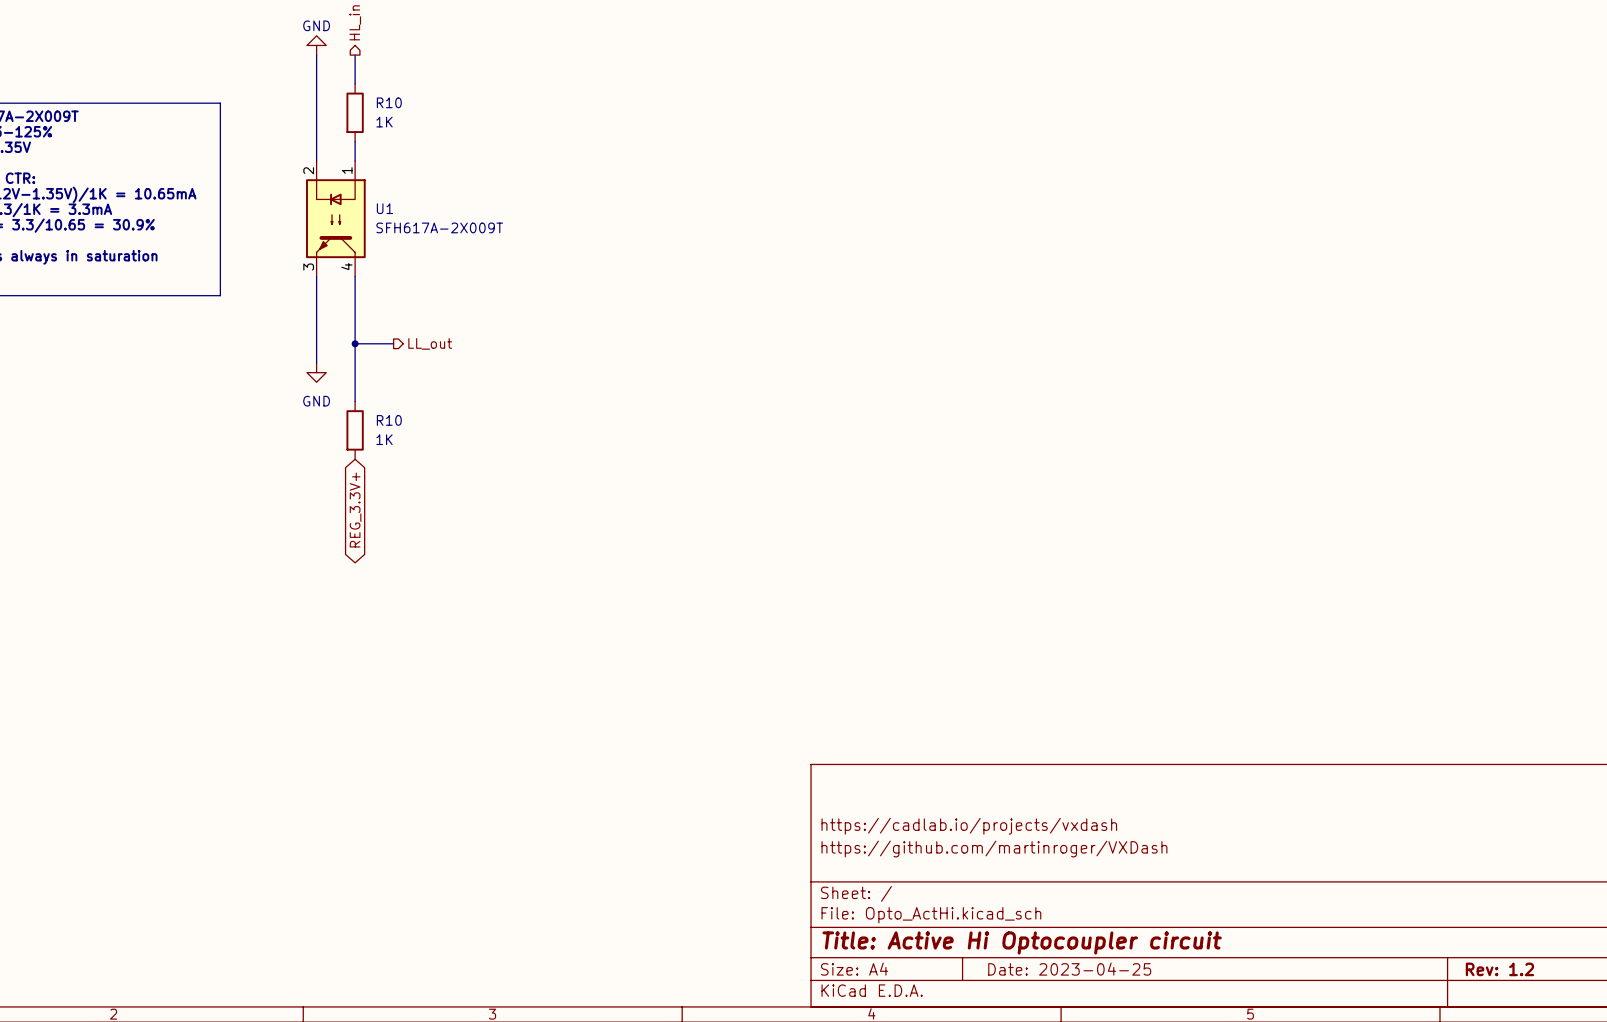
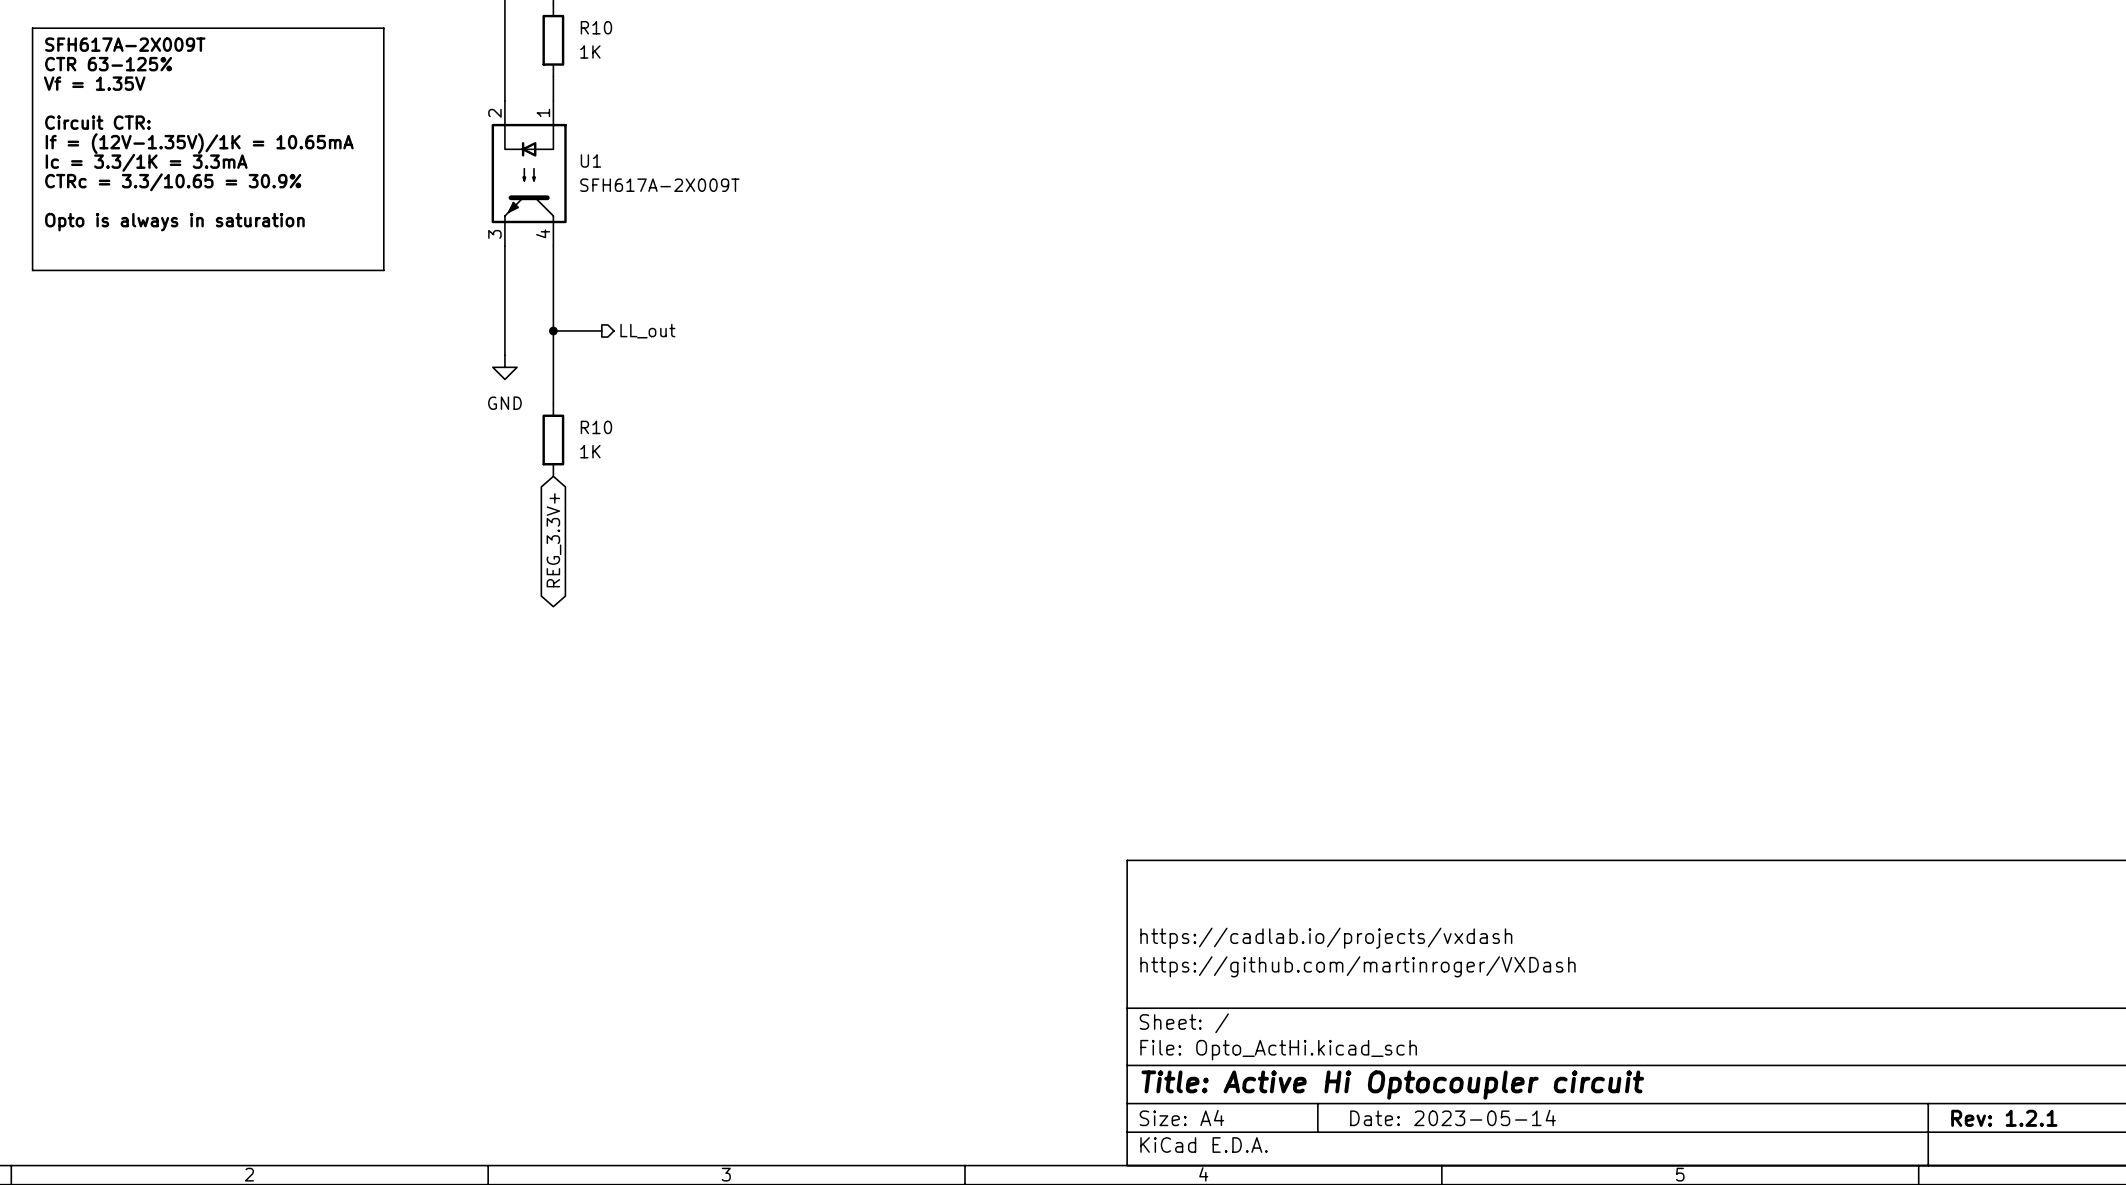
title block: Date: 2023-04-25 (1069, 969) -> Date: 2023-05-14 (1453, 1117)
title block: Rev: 1.2 (1499, 969) -> Rev: 1.2.1 (2004, 1118)

